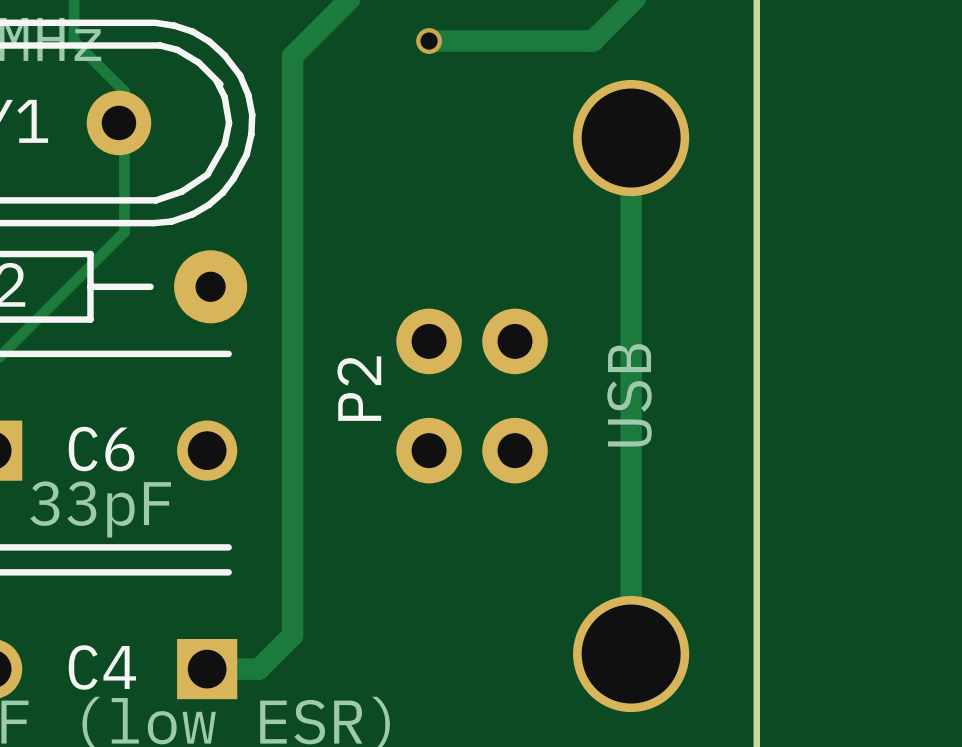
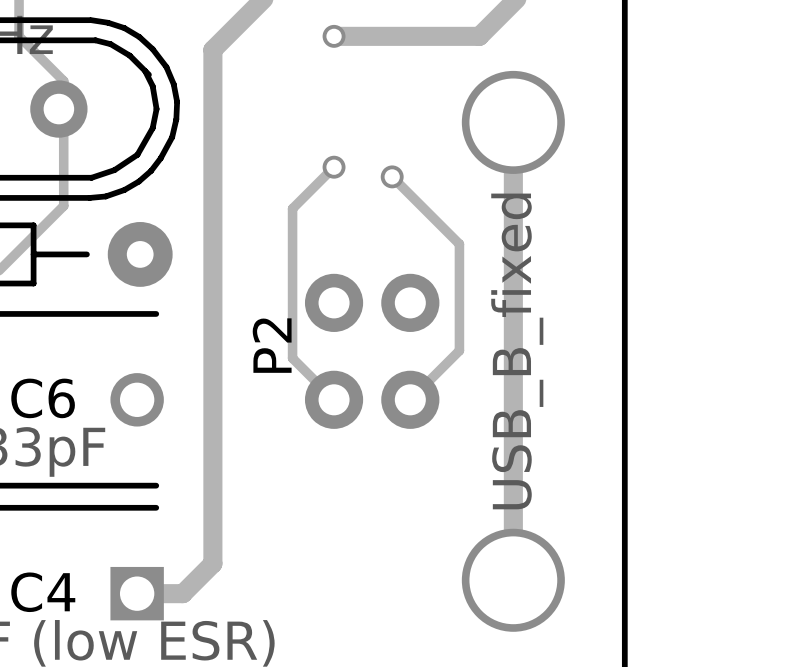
track: none -> (334, 167) (292, 208) (292, 358) (334, 399)
via: none -> (334, 167)
track: none -> (392, 176) (459, 244) (459, 350) (410, 399)
via: none -> (392, 176)
P2 value: USB (629, 395) -> USB_B_fixed (517, 351)

